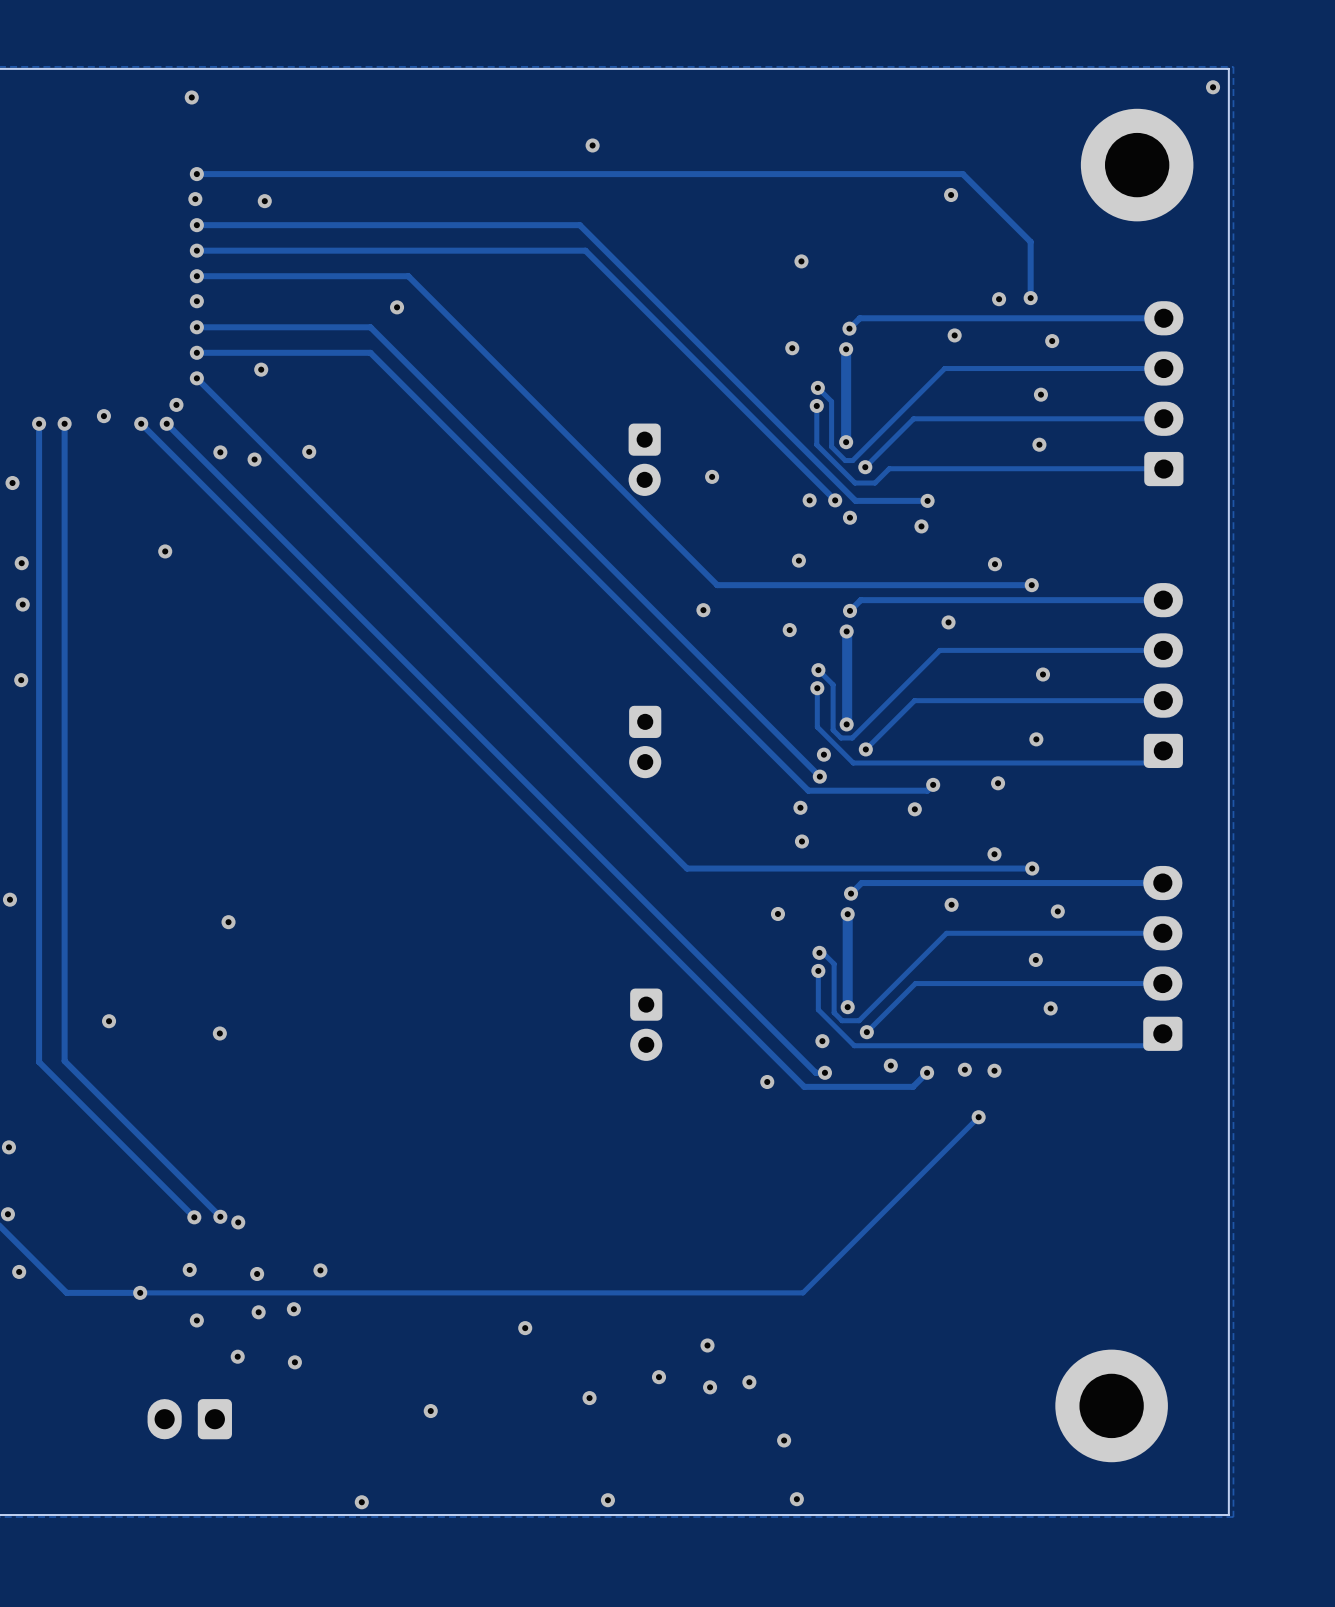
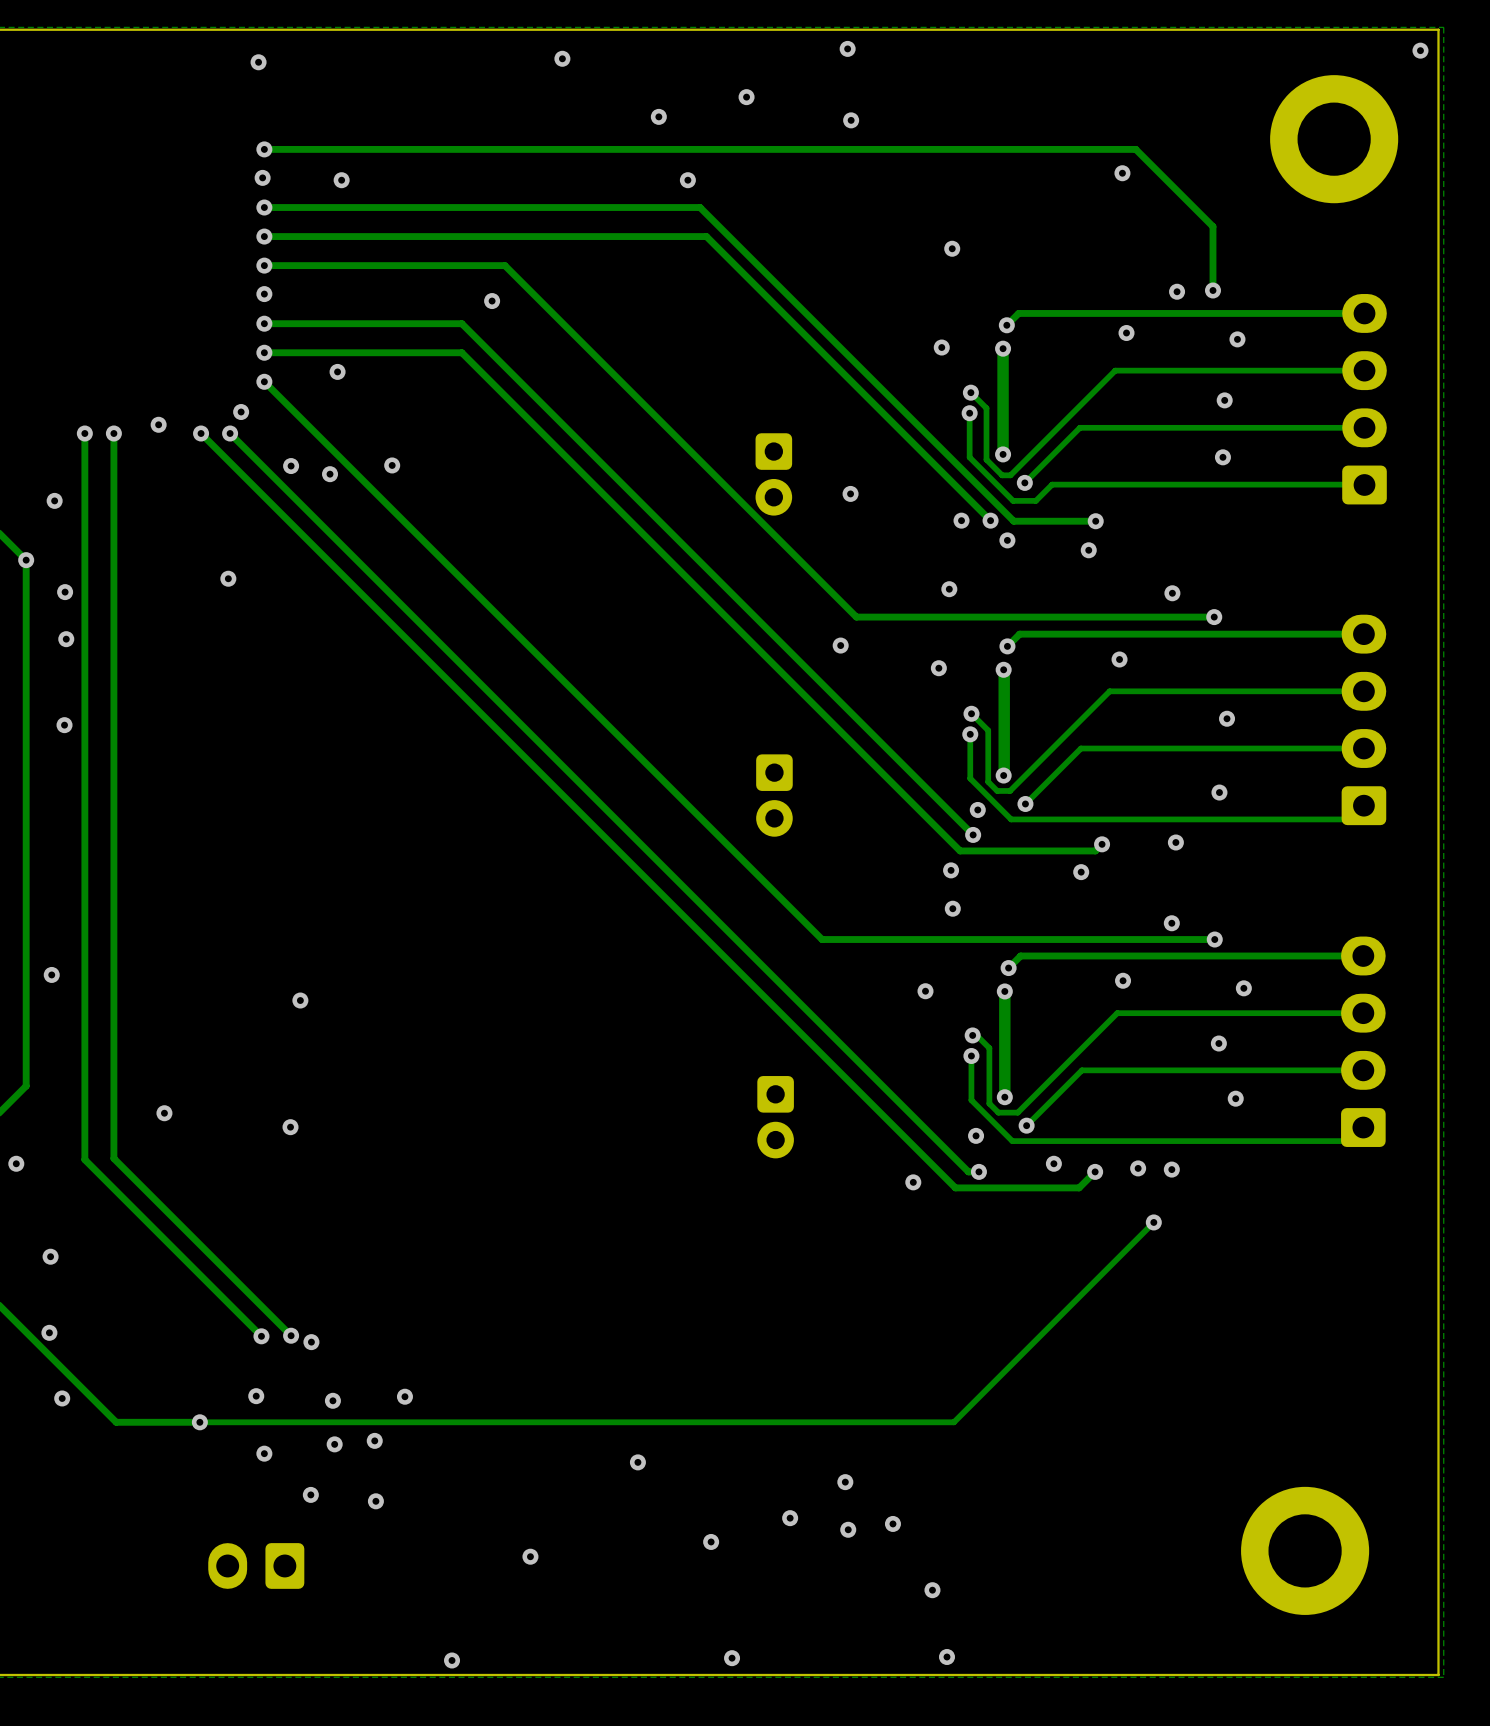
via: none -> (847, 48)
via: none -> (562, 58)
via: none -> (746, 97)
via: none -> (658, 116)
via: (592, 145) -> none
via: none -> (851, 120)
via: none -> (687, 180)

